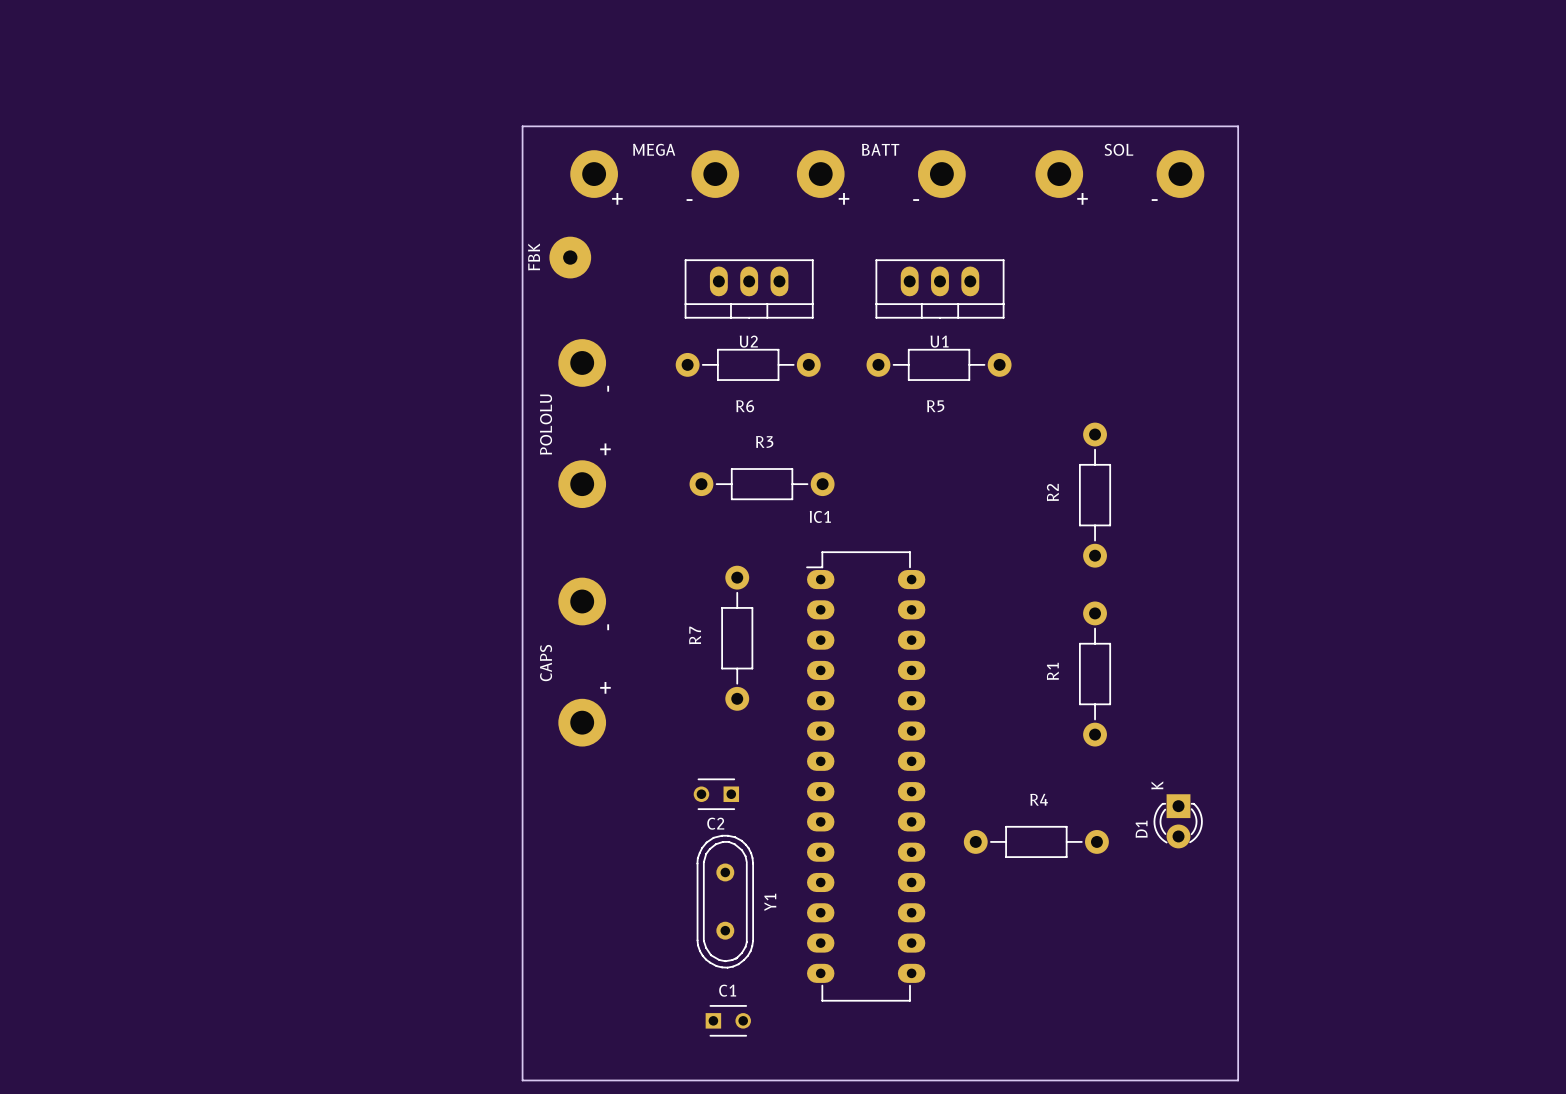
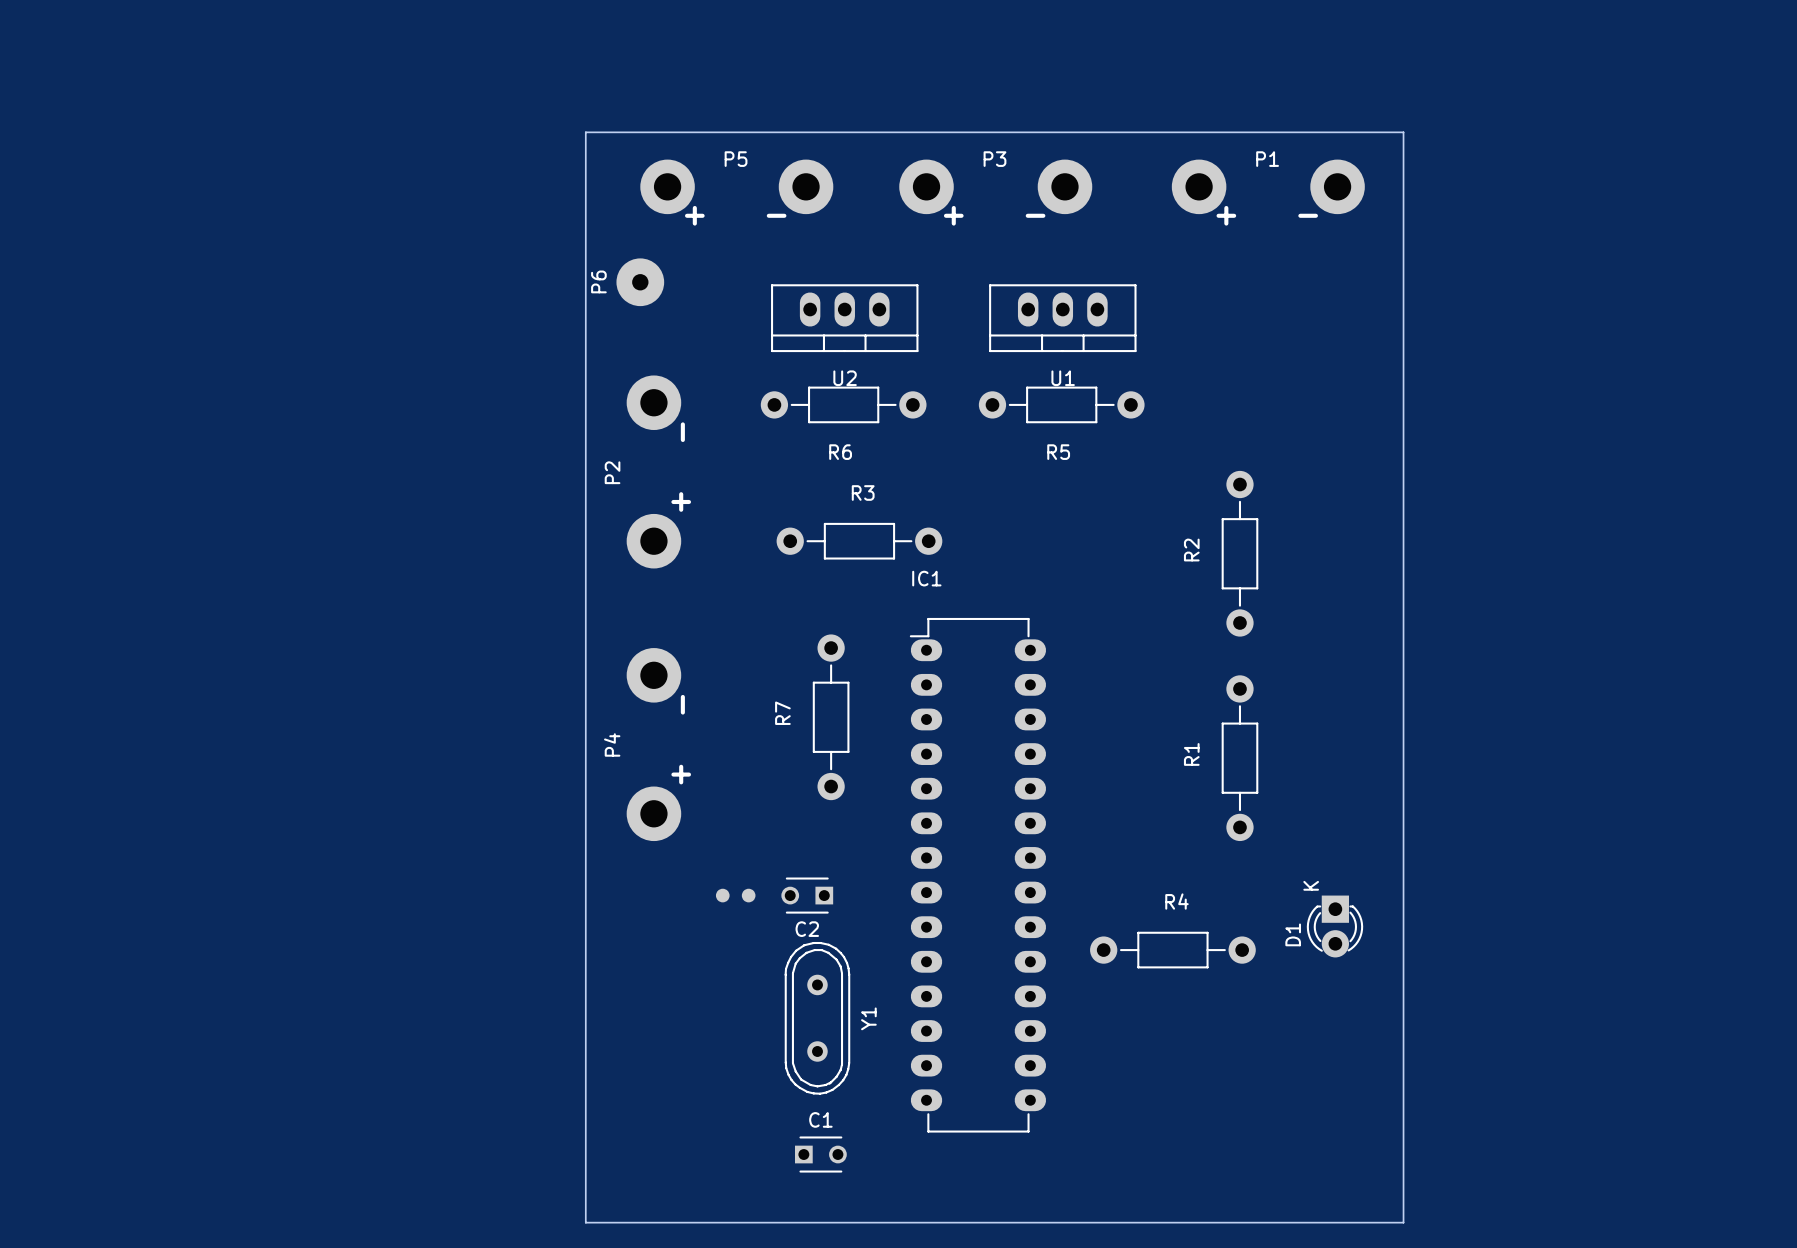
MEGA name: MEGA (654, 149) -> P5 (736, 159)
BATT name: BATT (880, 149) -> P3 (994, 159)
SOL name: SOL (1118, 149) -> P1 (1267, 159)
FBK name: FBK (534, 256) -> P6 (598, 281)
POLOLU name: POLOLU (546, 424) -> P2 (612, 472)
CAPS name: CAPS (546, 663) -> P4 (612, 744)
part: none -> (735, 895)

